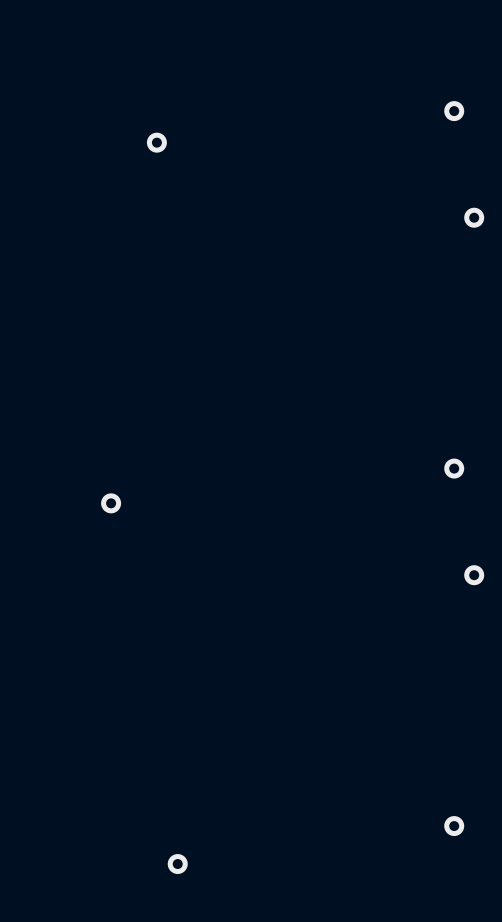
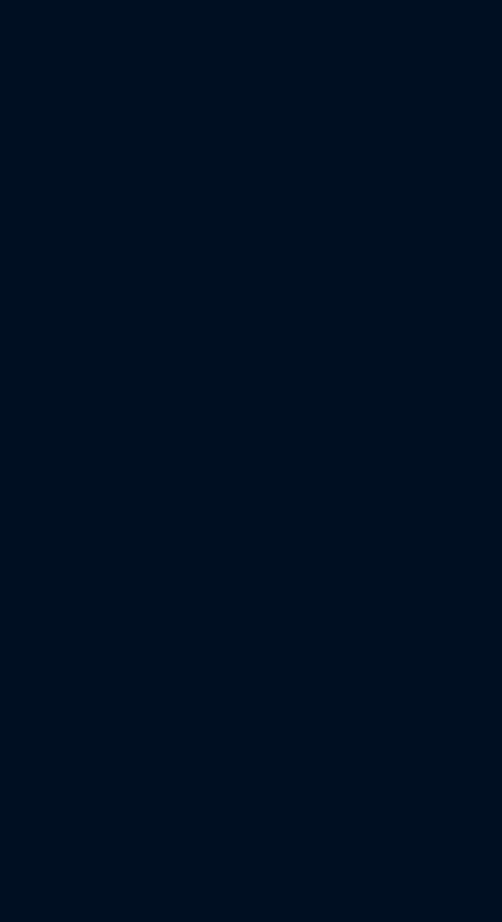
via: (454, 111) -> none
via: (156, 142) -> none
via: (474, 217) -> none
via: (454, 468) -> none
via: (111, 503) -> none
via: (474, 575) -> none
via: (454, 826) -> none
via: (177, 864) -> none

